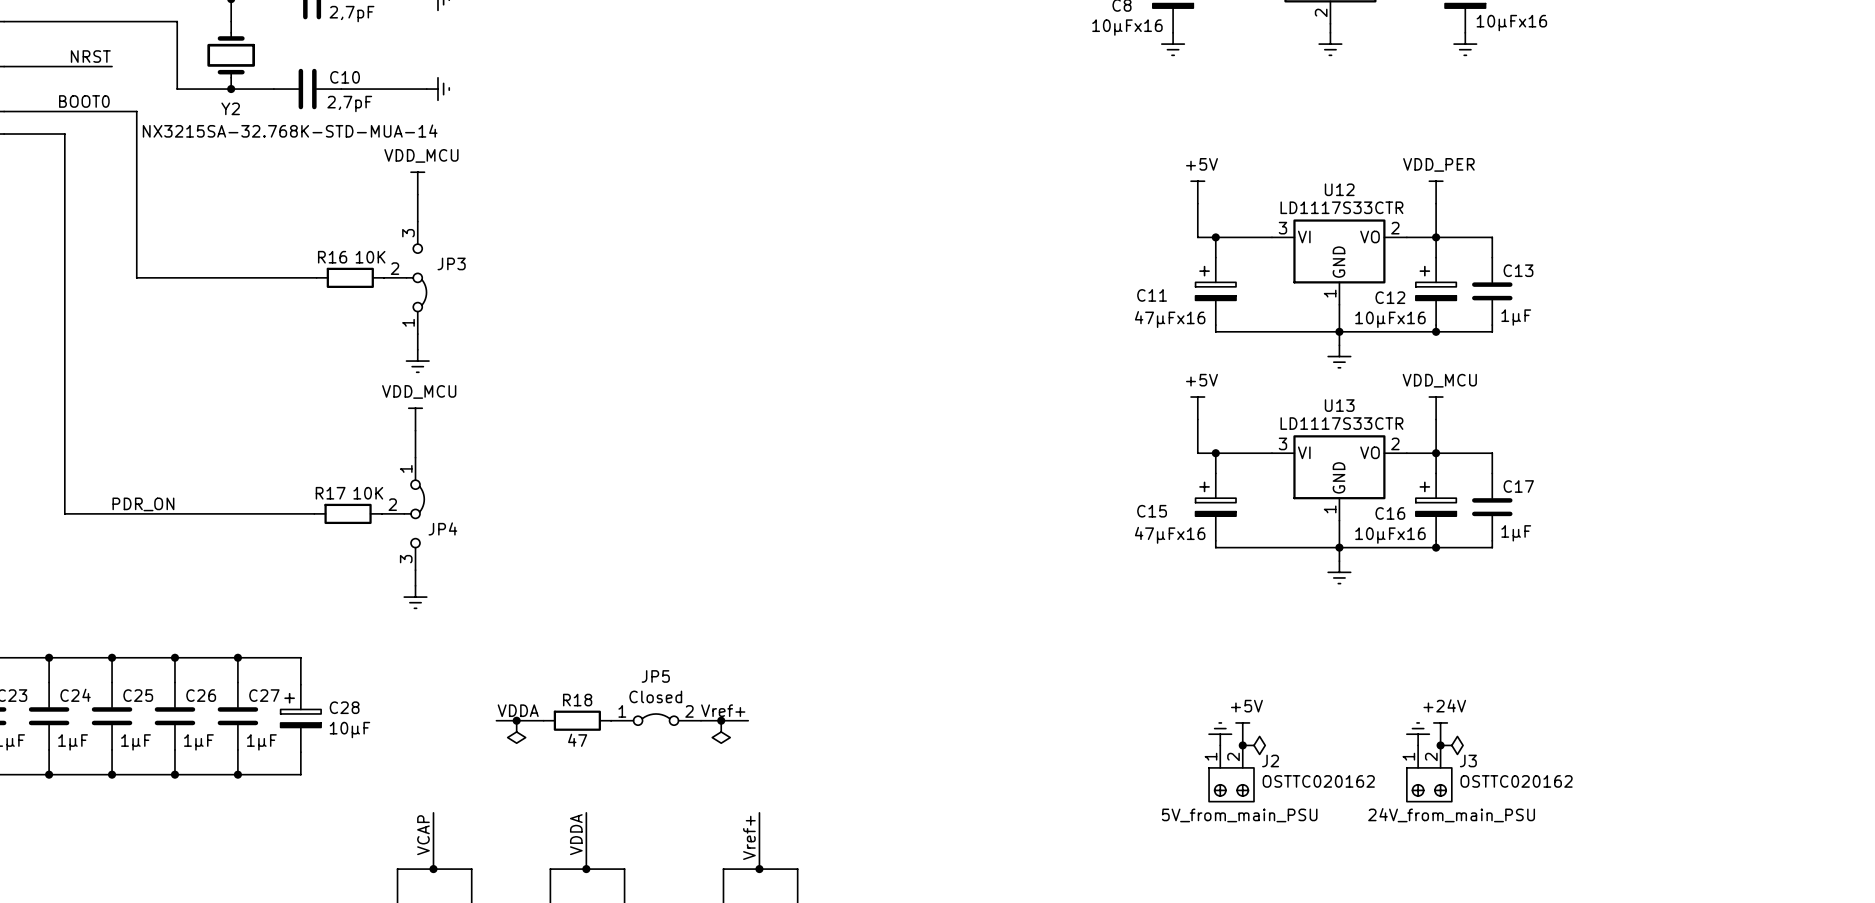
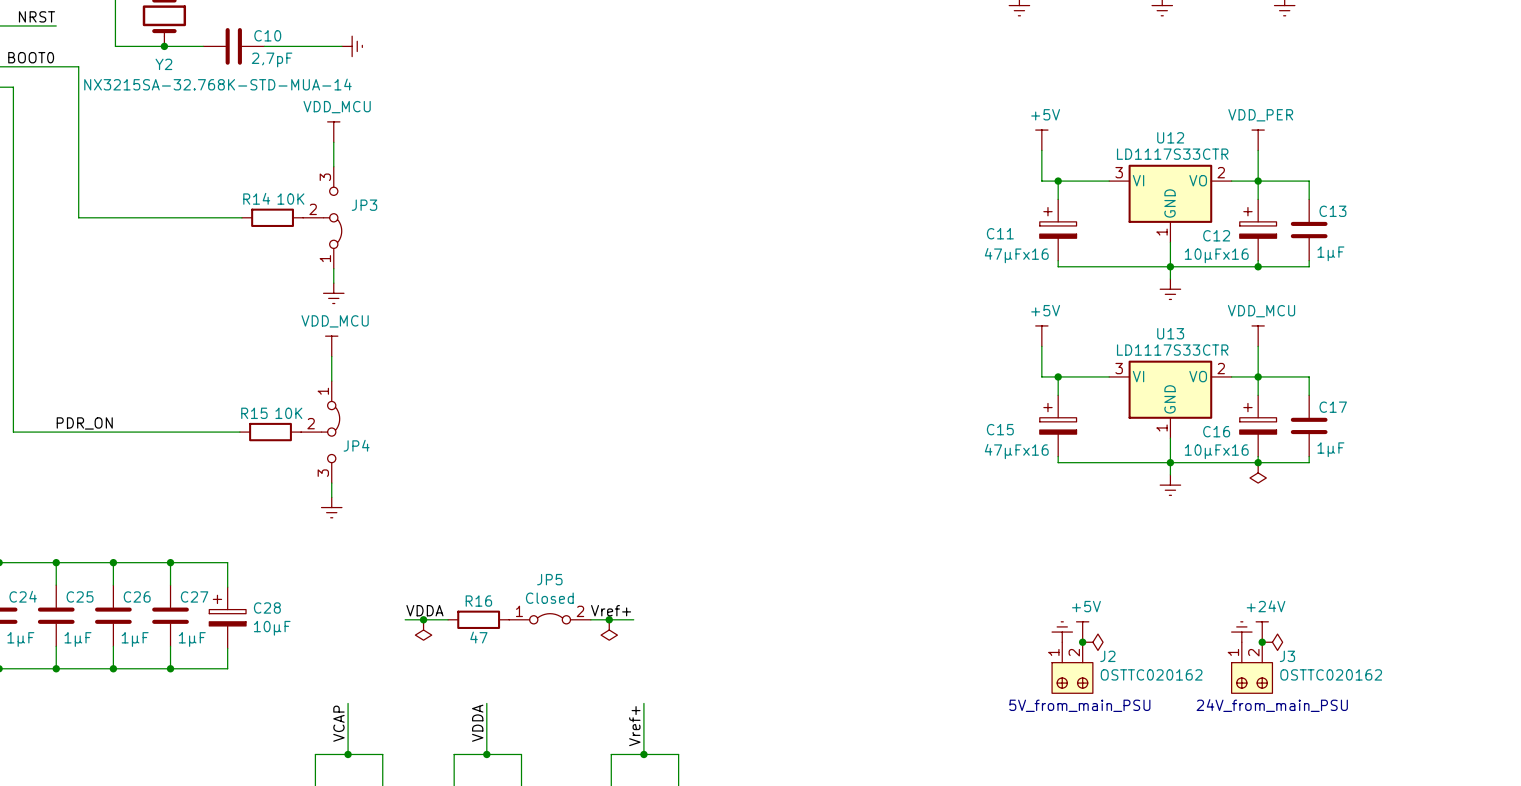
R16 name: R16 (332, 257) -> R14 (256, 198)
R17 name: R17 (330, 493) -> R15 (254, 413)
power symbol: none -> (1258, 472)
R18 name: R18 (577, 700) -> R16 (478, 601)

